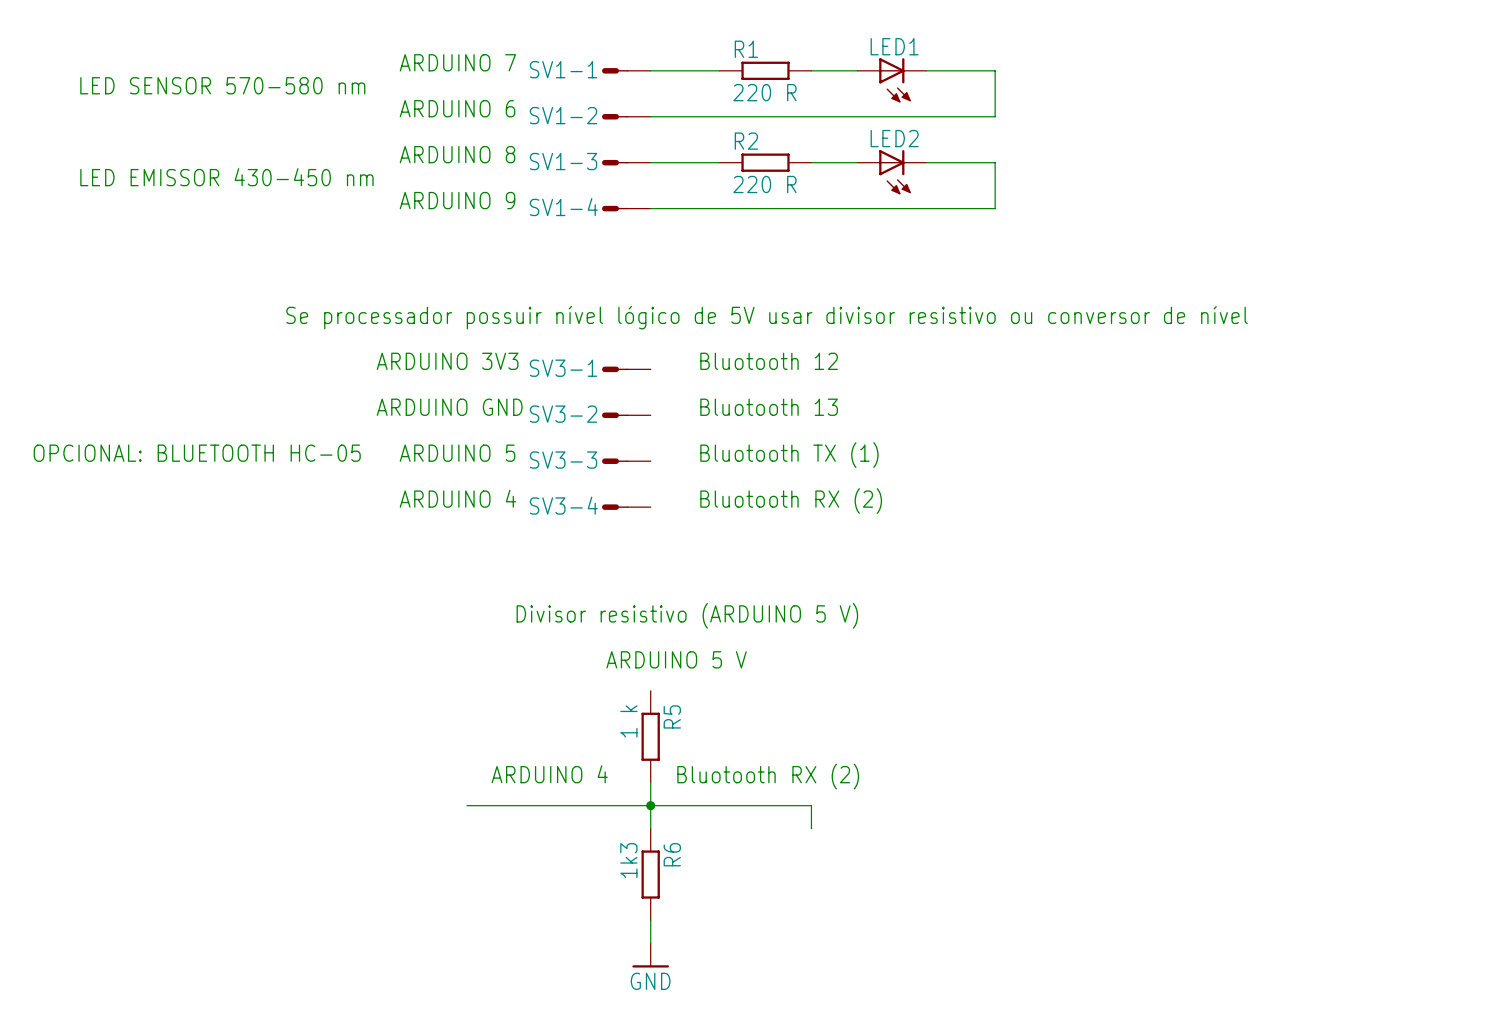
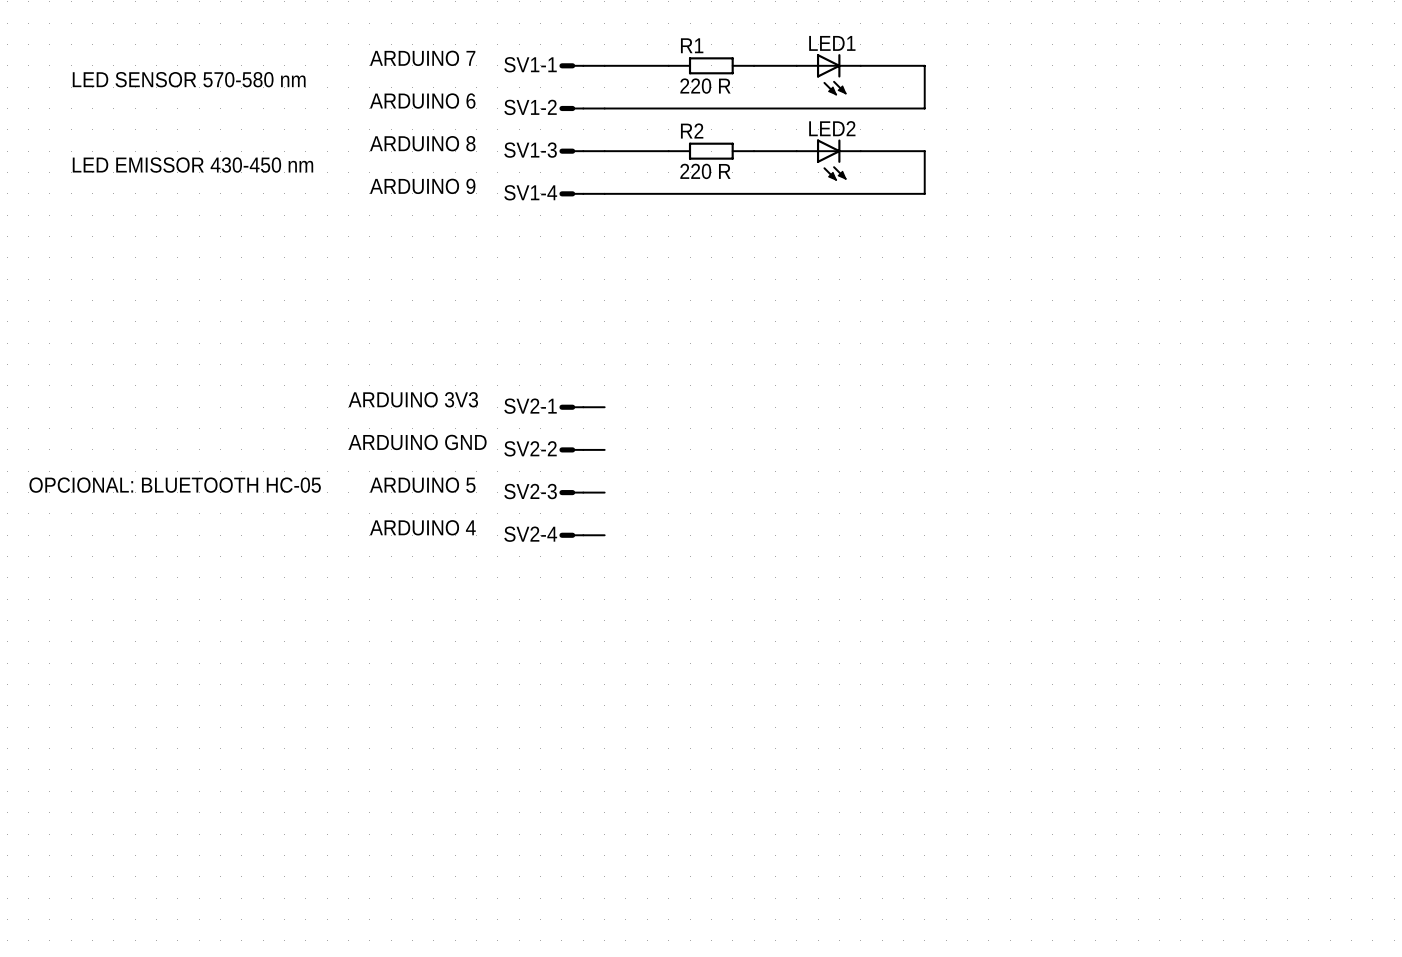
text: Se processador possuir nível lógico de 5V usar divisor resistivo ou conversor de nível (767, 317) -> none
text position: ARDUINO 3V3 (447, 361) -> ARDUINO 3V3 (413, 399)
text: Bluotooth 12 (769, 361) -> none
SV3-1: (626, 369) -> none
text position: ARDUINO GND (449, 407) -> ARDUINO GND (417, 442)
text: Bluotooth 13 (769, 407) -> none
SV3-2: (626, 415) -> none
SV2-1: none -> (582, 407)
text position: OPCIONAL: BLUETOOTH HC-05 (197, 453) -> OPCIONAL: BLUETOOTH HC-05 (175, 485)
text position: ARDUINO 5 (457, 453) -> ARDUINO 5 (422, 485)
text: Bluotooth TX (1) (789, 455) -> none
SV3-3: (626, 461) -> none
SV2-2: none -> (582, 449)
text position: ARDUINO 4 (457, 498) -> ARDUINO 4 (422, 527)
text: Bluotooth RX (2) (791, 501) -> none
SV3-4: (626, 507) -> none
SV2-3: none -> (582, 492)
SV2-4: none -> (582, 535)
text: Divisor resistivo (ARDUINO 5 V) (687, 615) -> none
text: ARDUINO 5 V (676, 659) -> none
R5: 1 k (650, 736) -> none
text: ARDUINO 4 (549, 774) -> none
text: Bluotooth RX (2) (768, 776) -> none
wire: (650, 782) (650, 828) -> none
wire: (466, 805) (811, 805) (811, 828) -> none
junction: (650, 805) -> none
R6: 1k3 (650, 874) -> none
wire: (650, 920) (650, 943) -> none
power symbol: GND (650, 955) -> none

